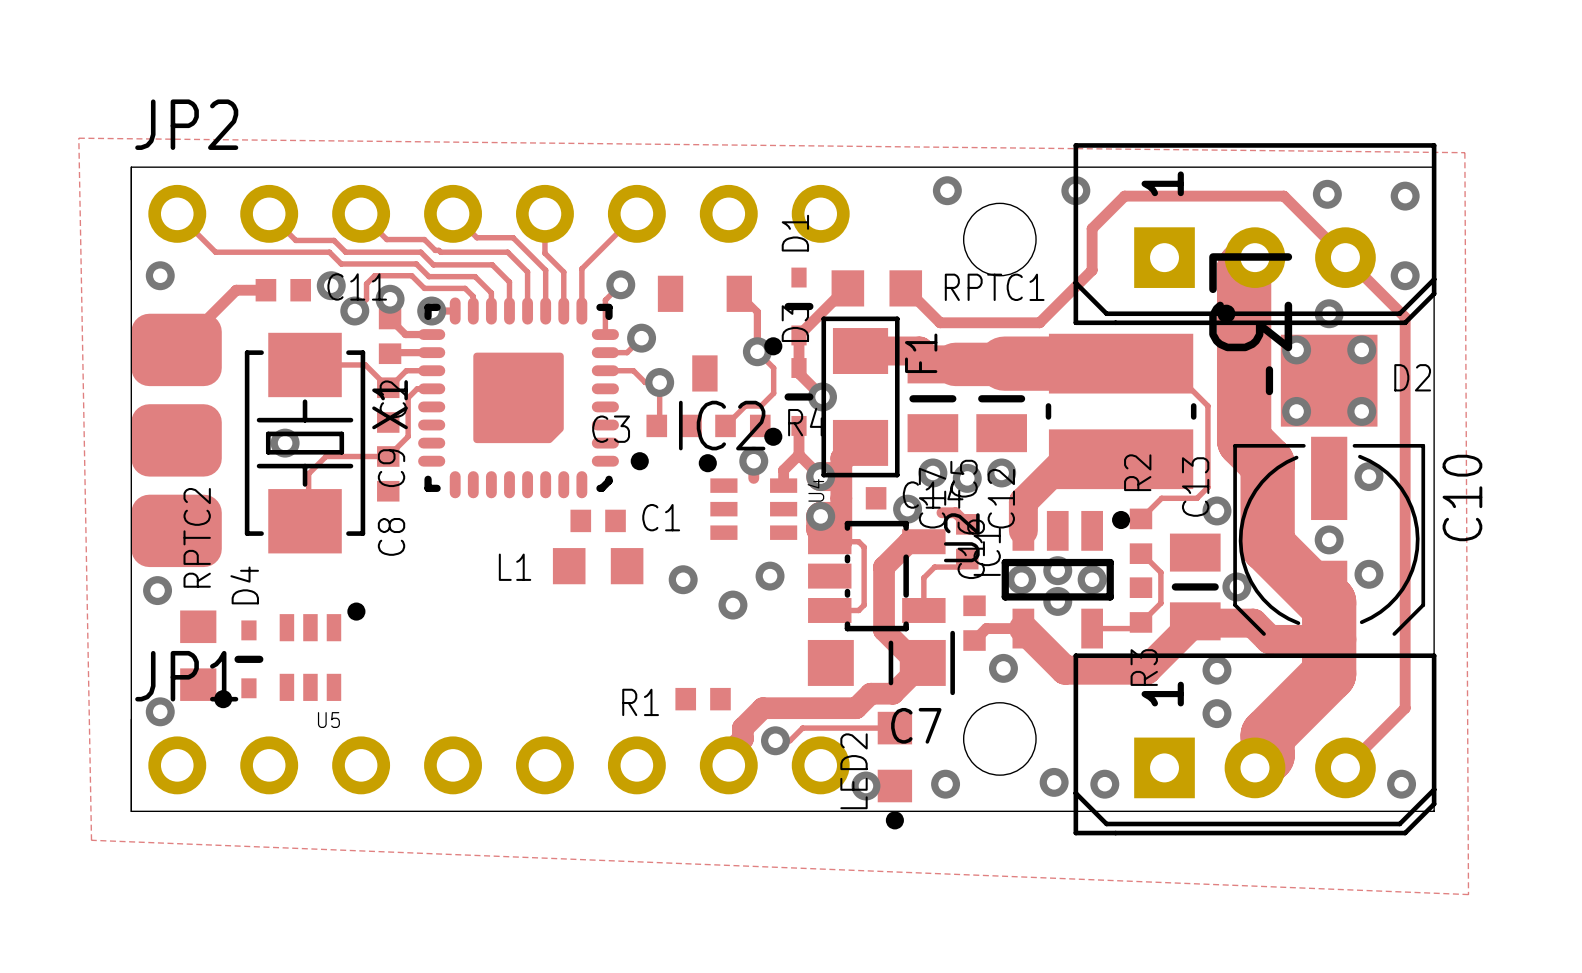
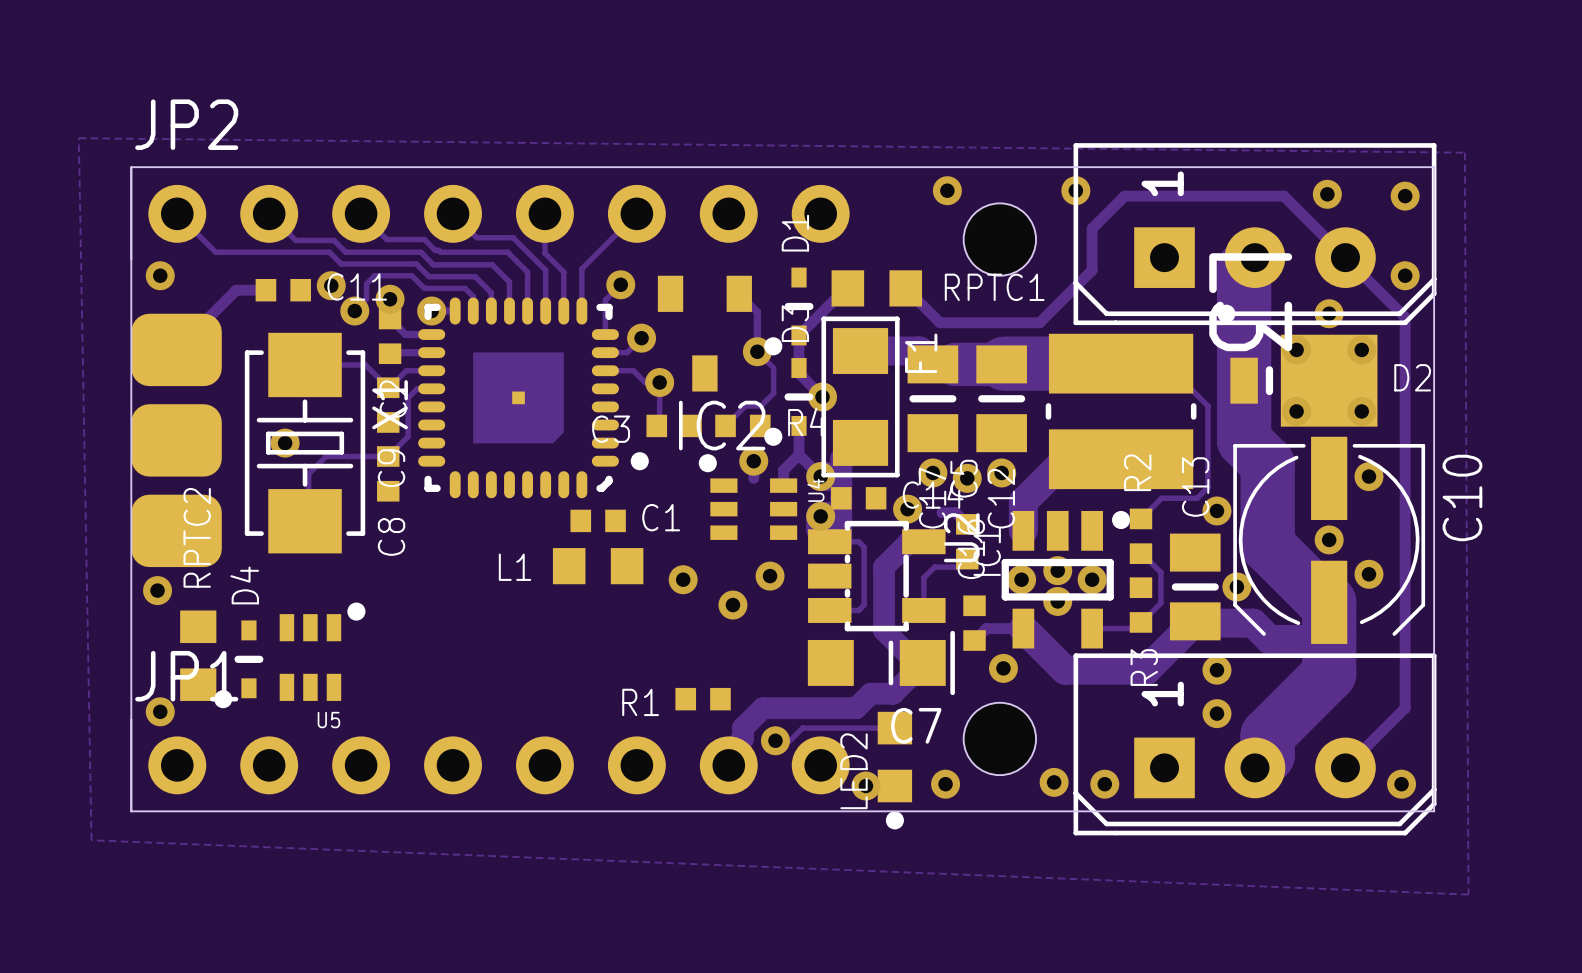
part footprint: [418, 297, 649, 499] -> [418, 297, 649, 499]

